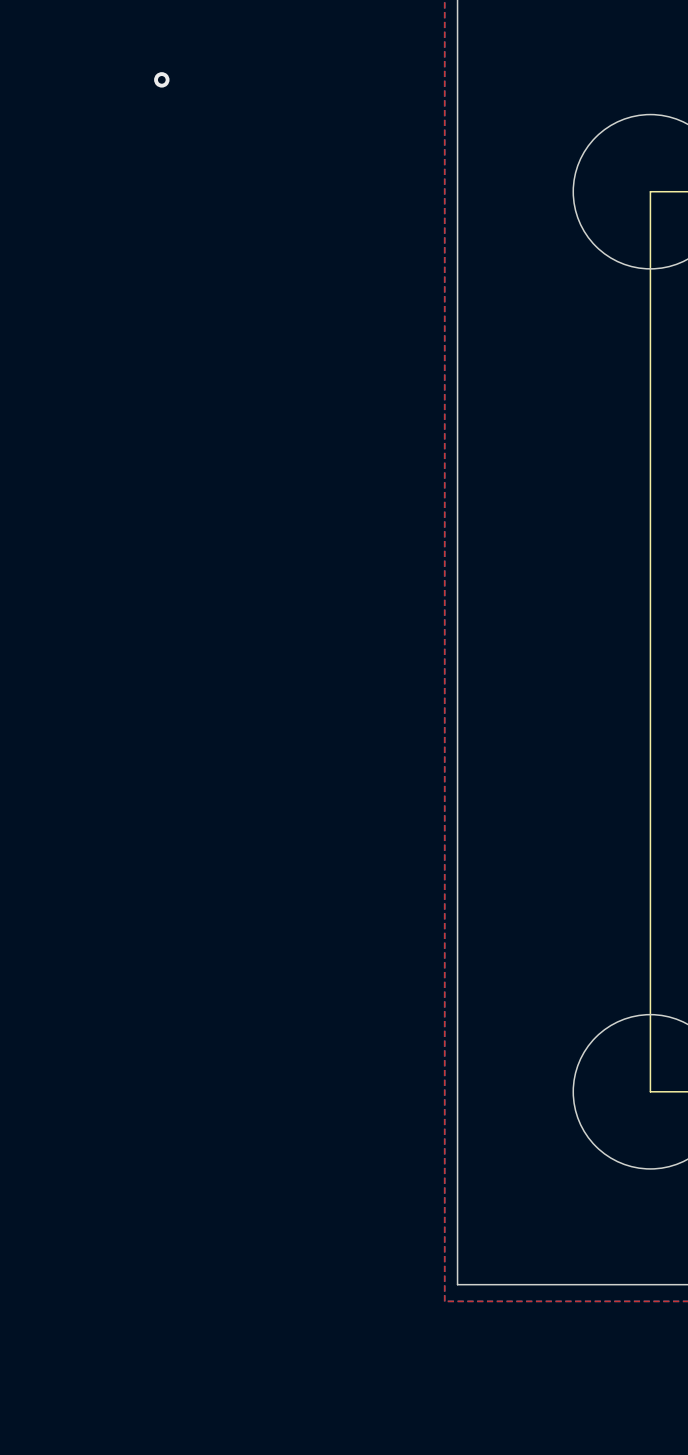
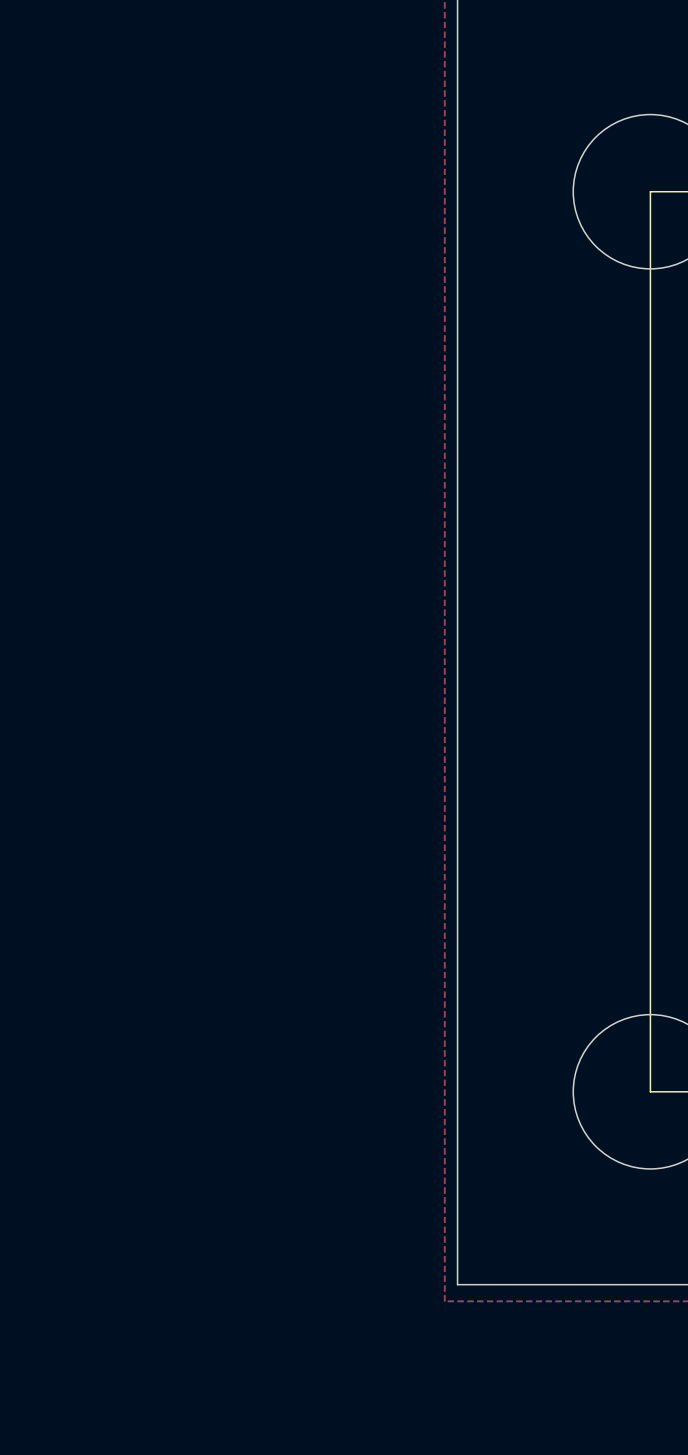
via: (161, 79) -> none

